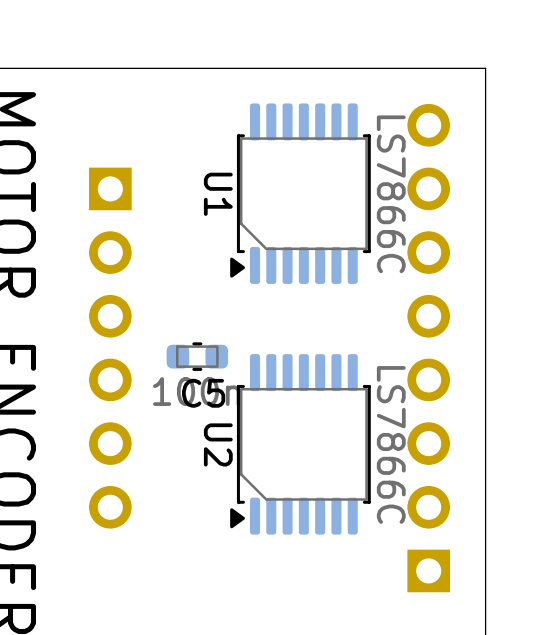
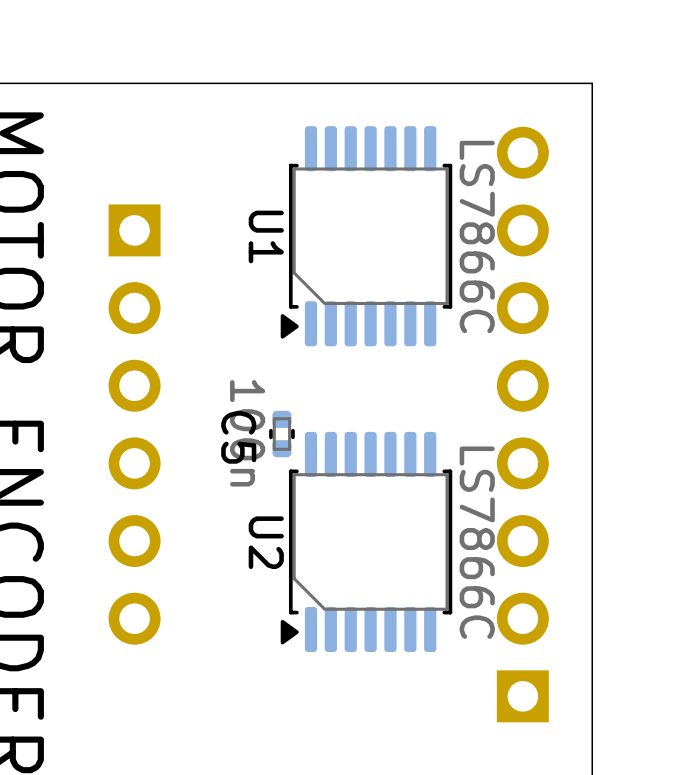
C5 footprint: [166, 342, 229, 371] -> [269, 410, 295, 458]
C5 name position: C5 (203, 393) -> C5 (238, 437)

